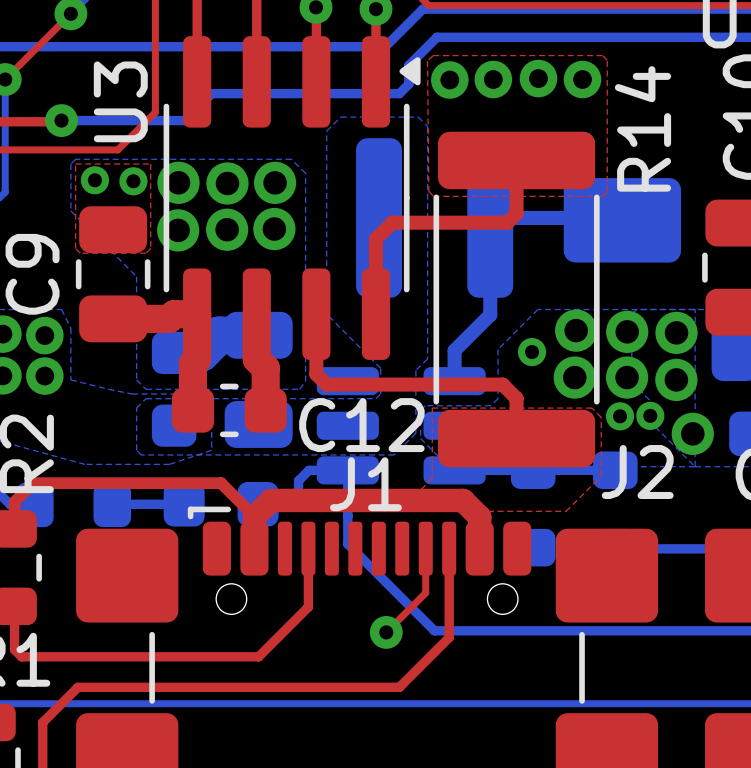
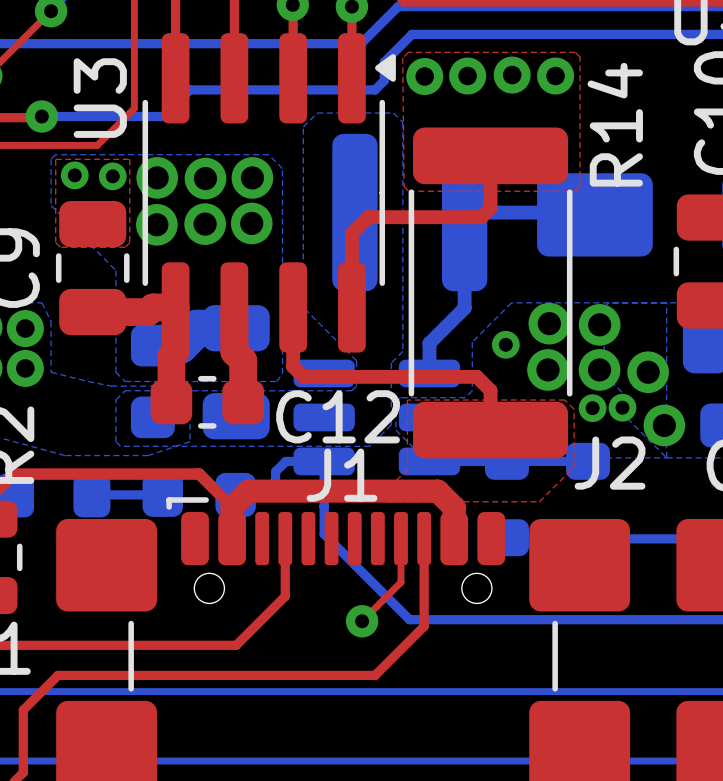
via: (676, 332) -> none

